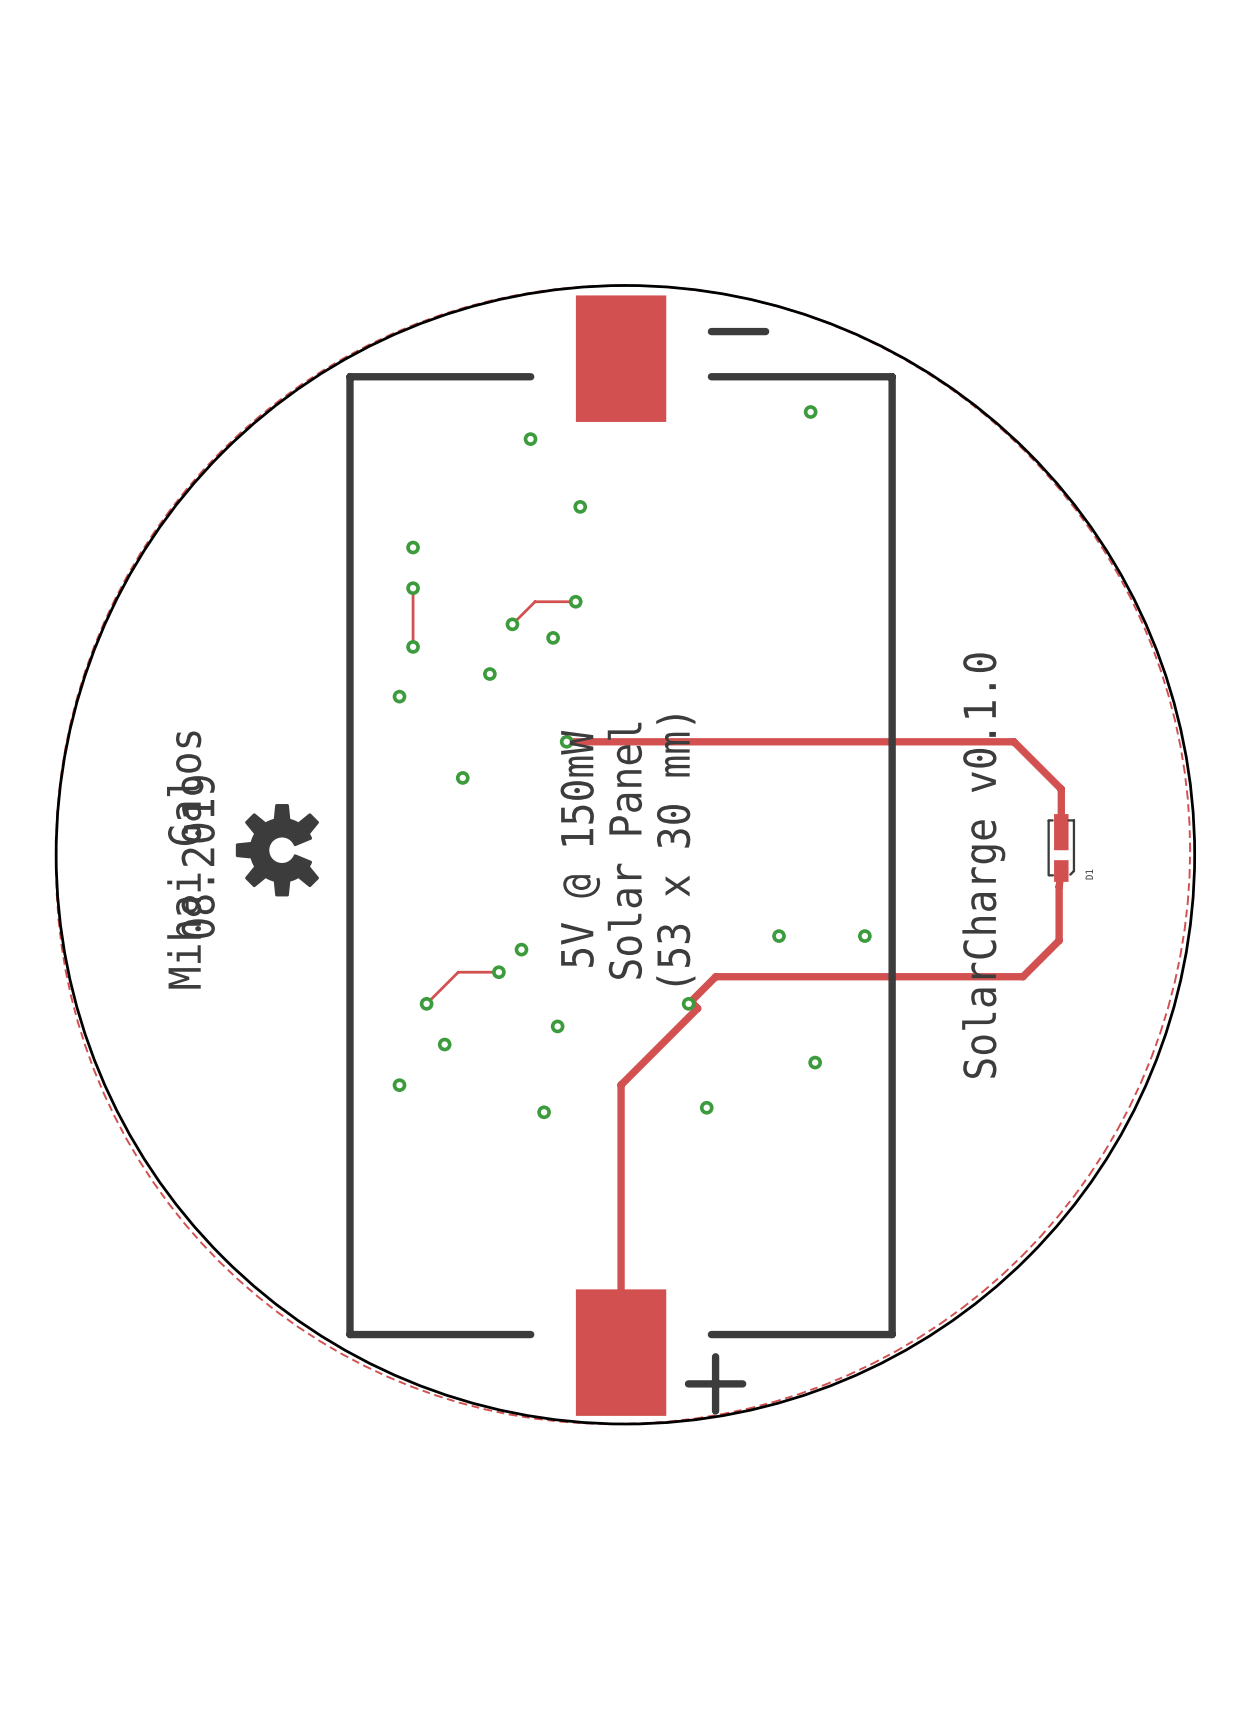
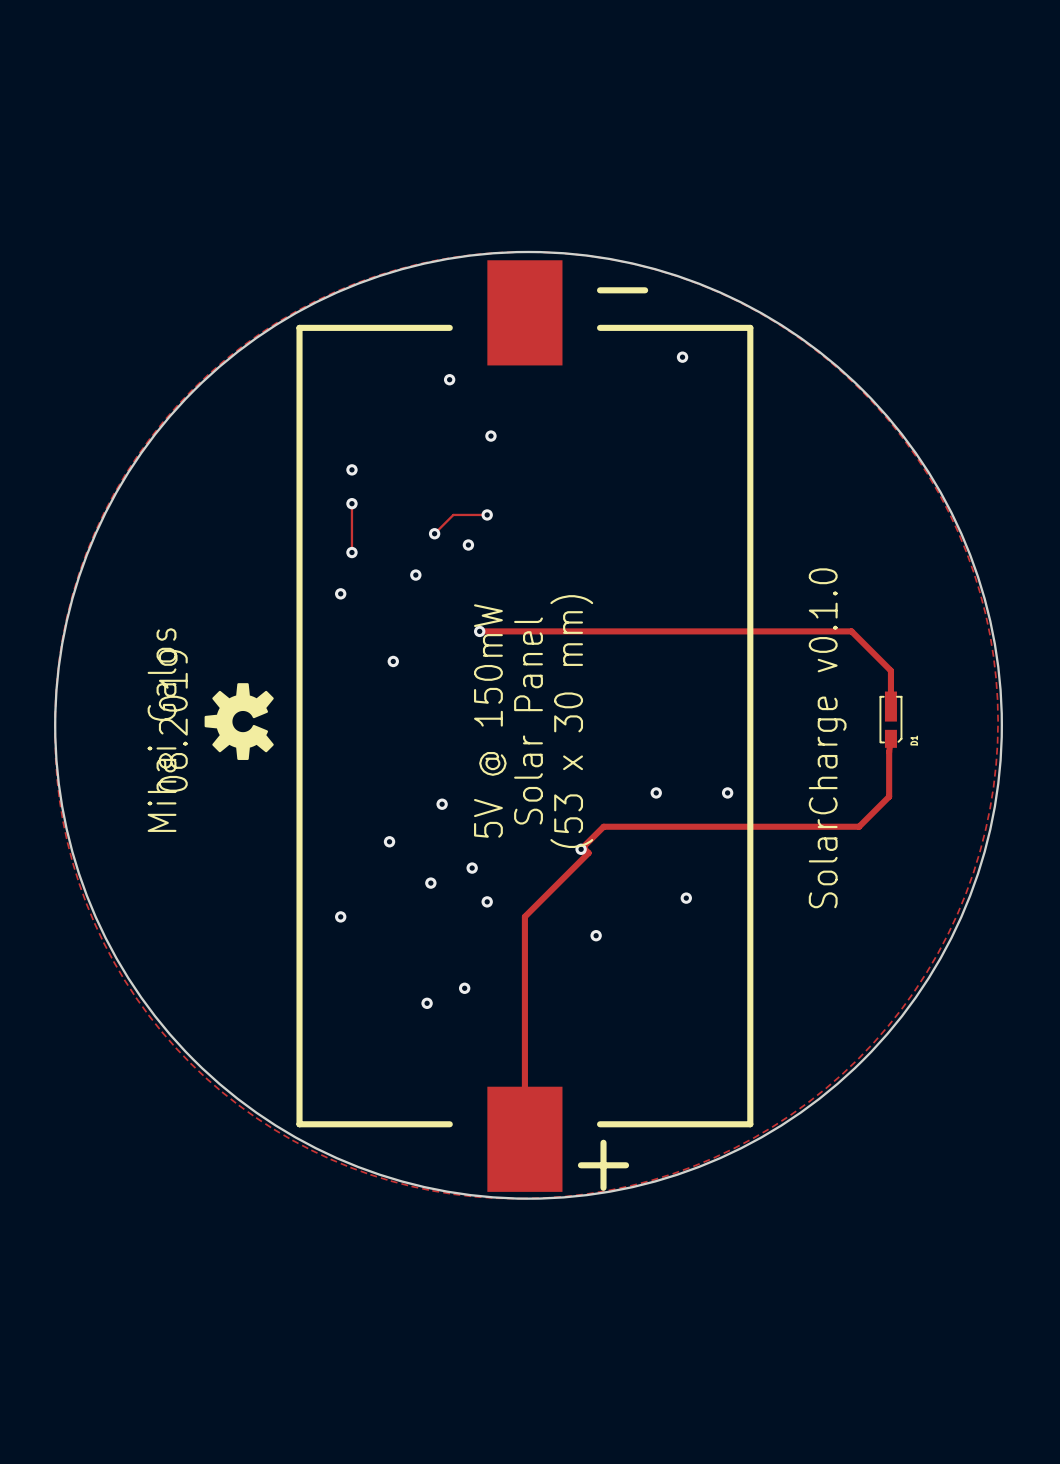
track: (498, 972) (458, 972) (426, 1003) -> none
via: (498, 972) -> none
via: none -> (389, 841)
via: (426, 1003) -> none
via: (444, 1044) -> none
via: none -> (430, 883)
via: none -> (487, 901)
via: (544, 1112) -> none
via: none -> (464, 988)
via: none -> (427, 1003)

